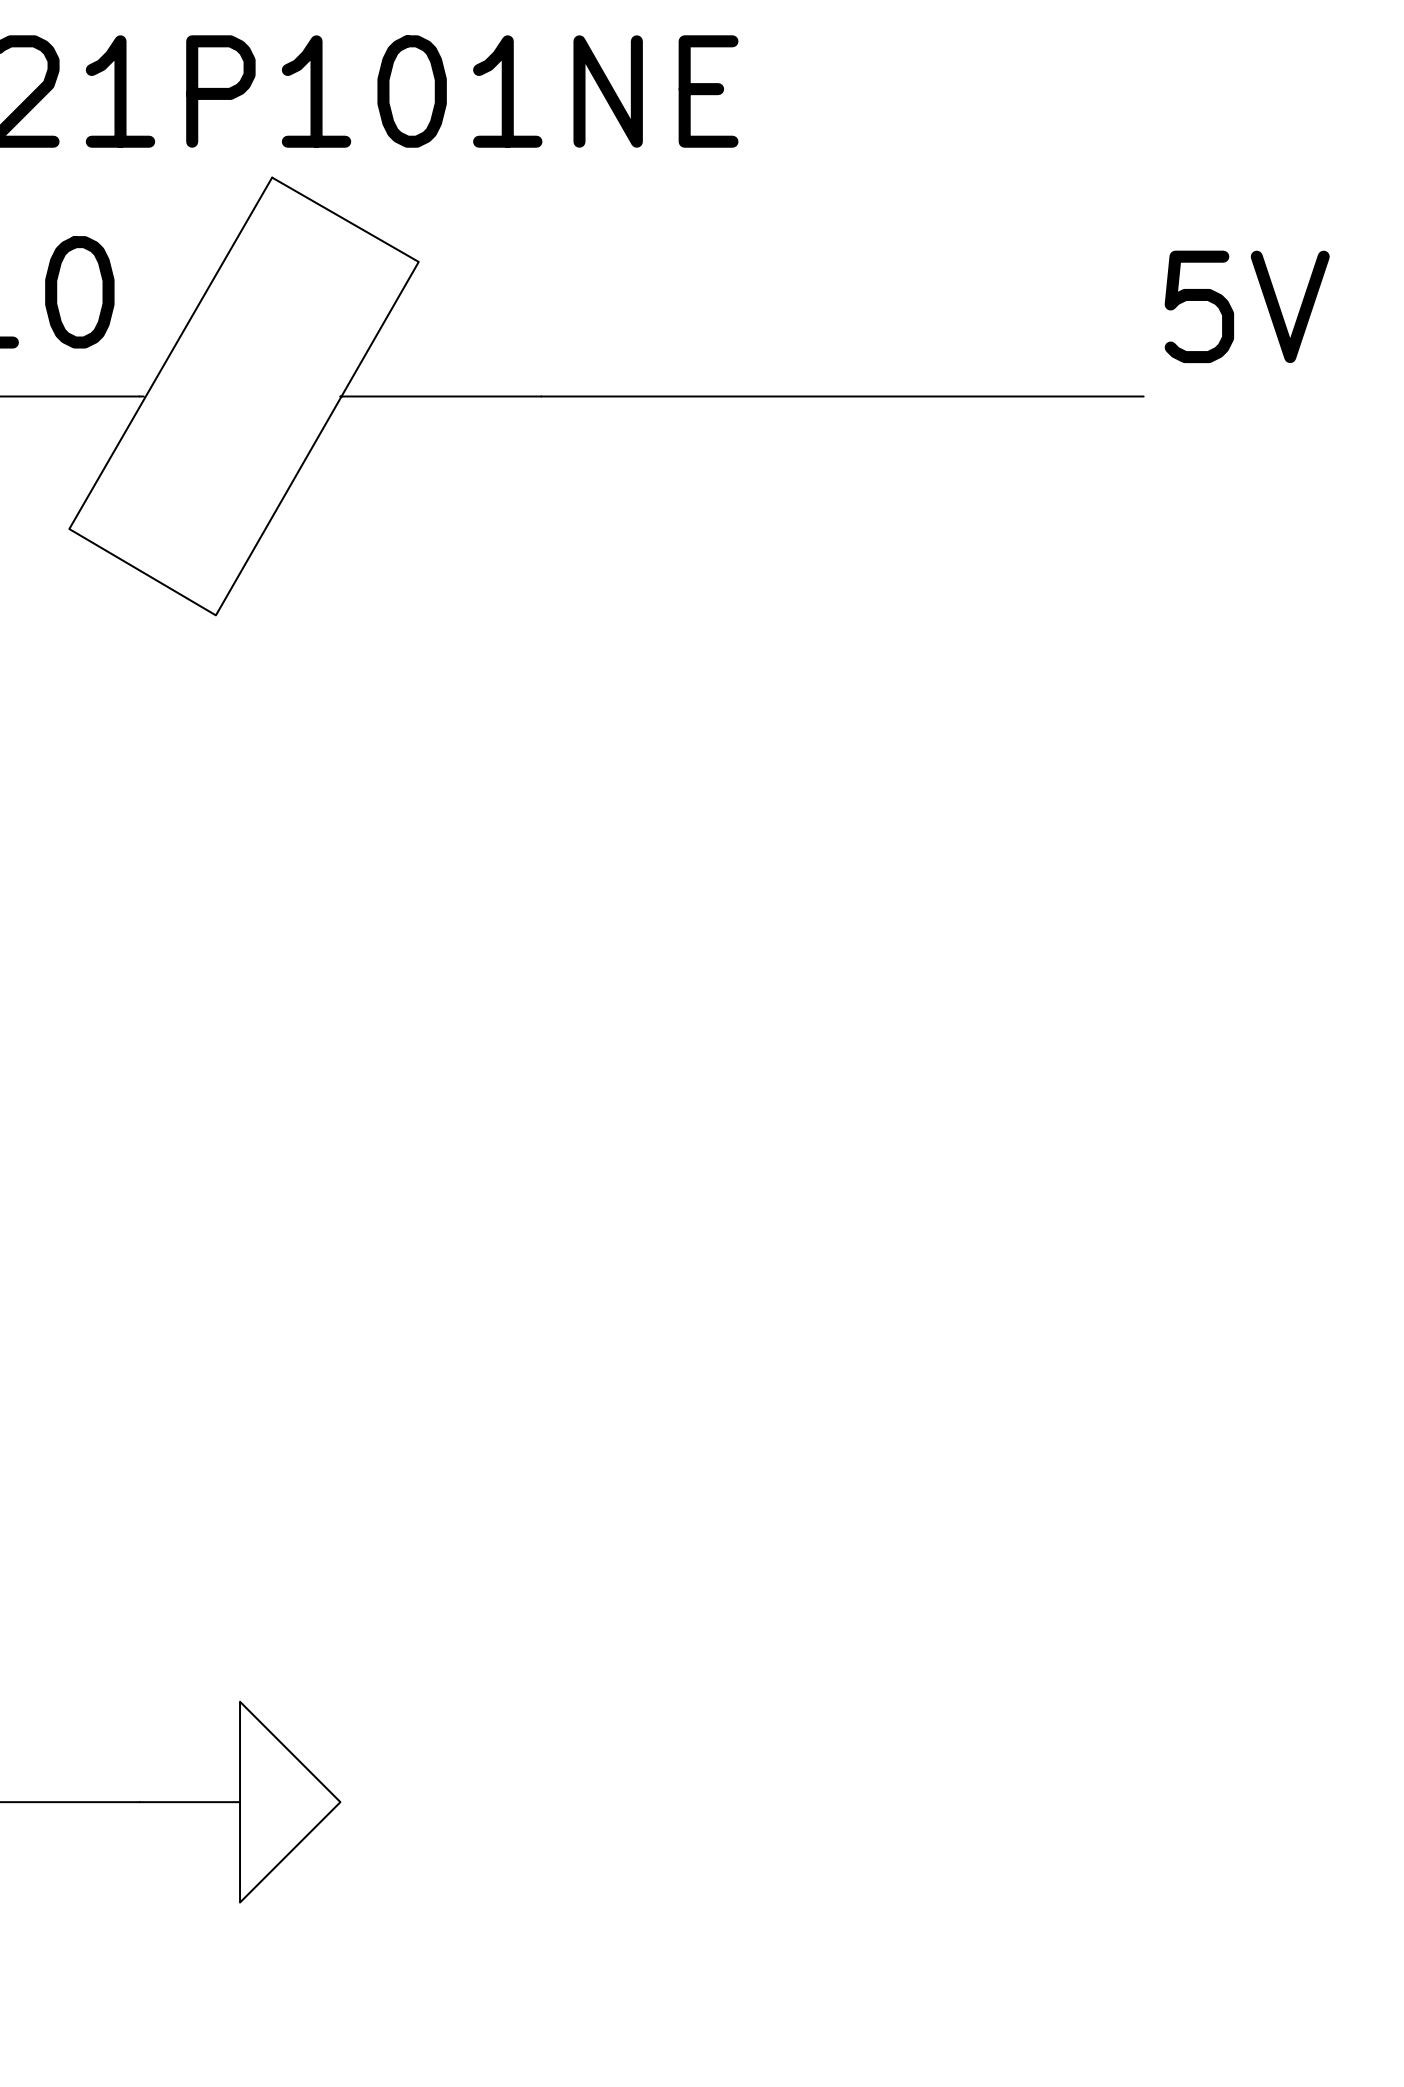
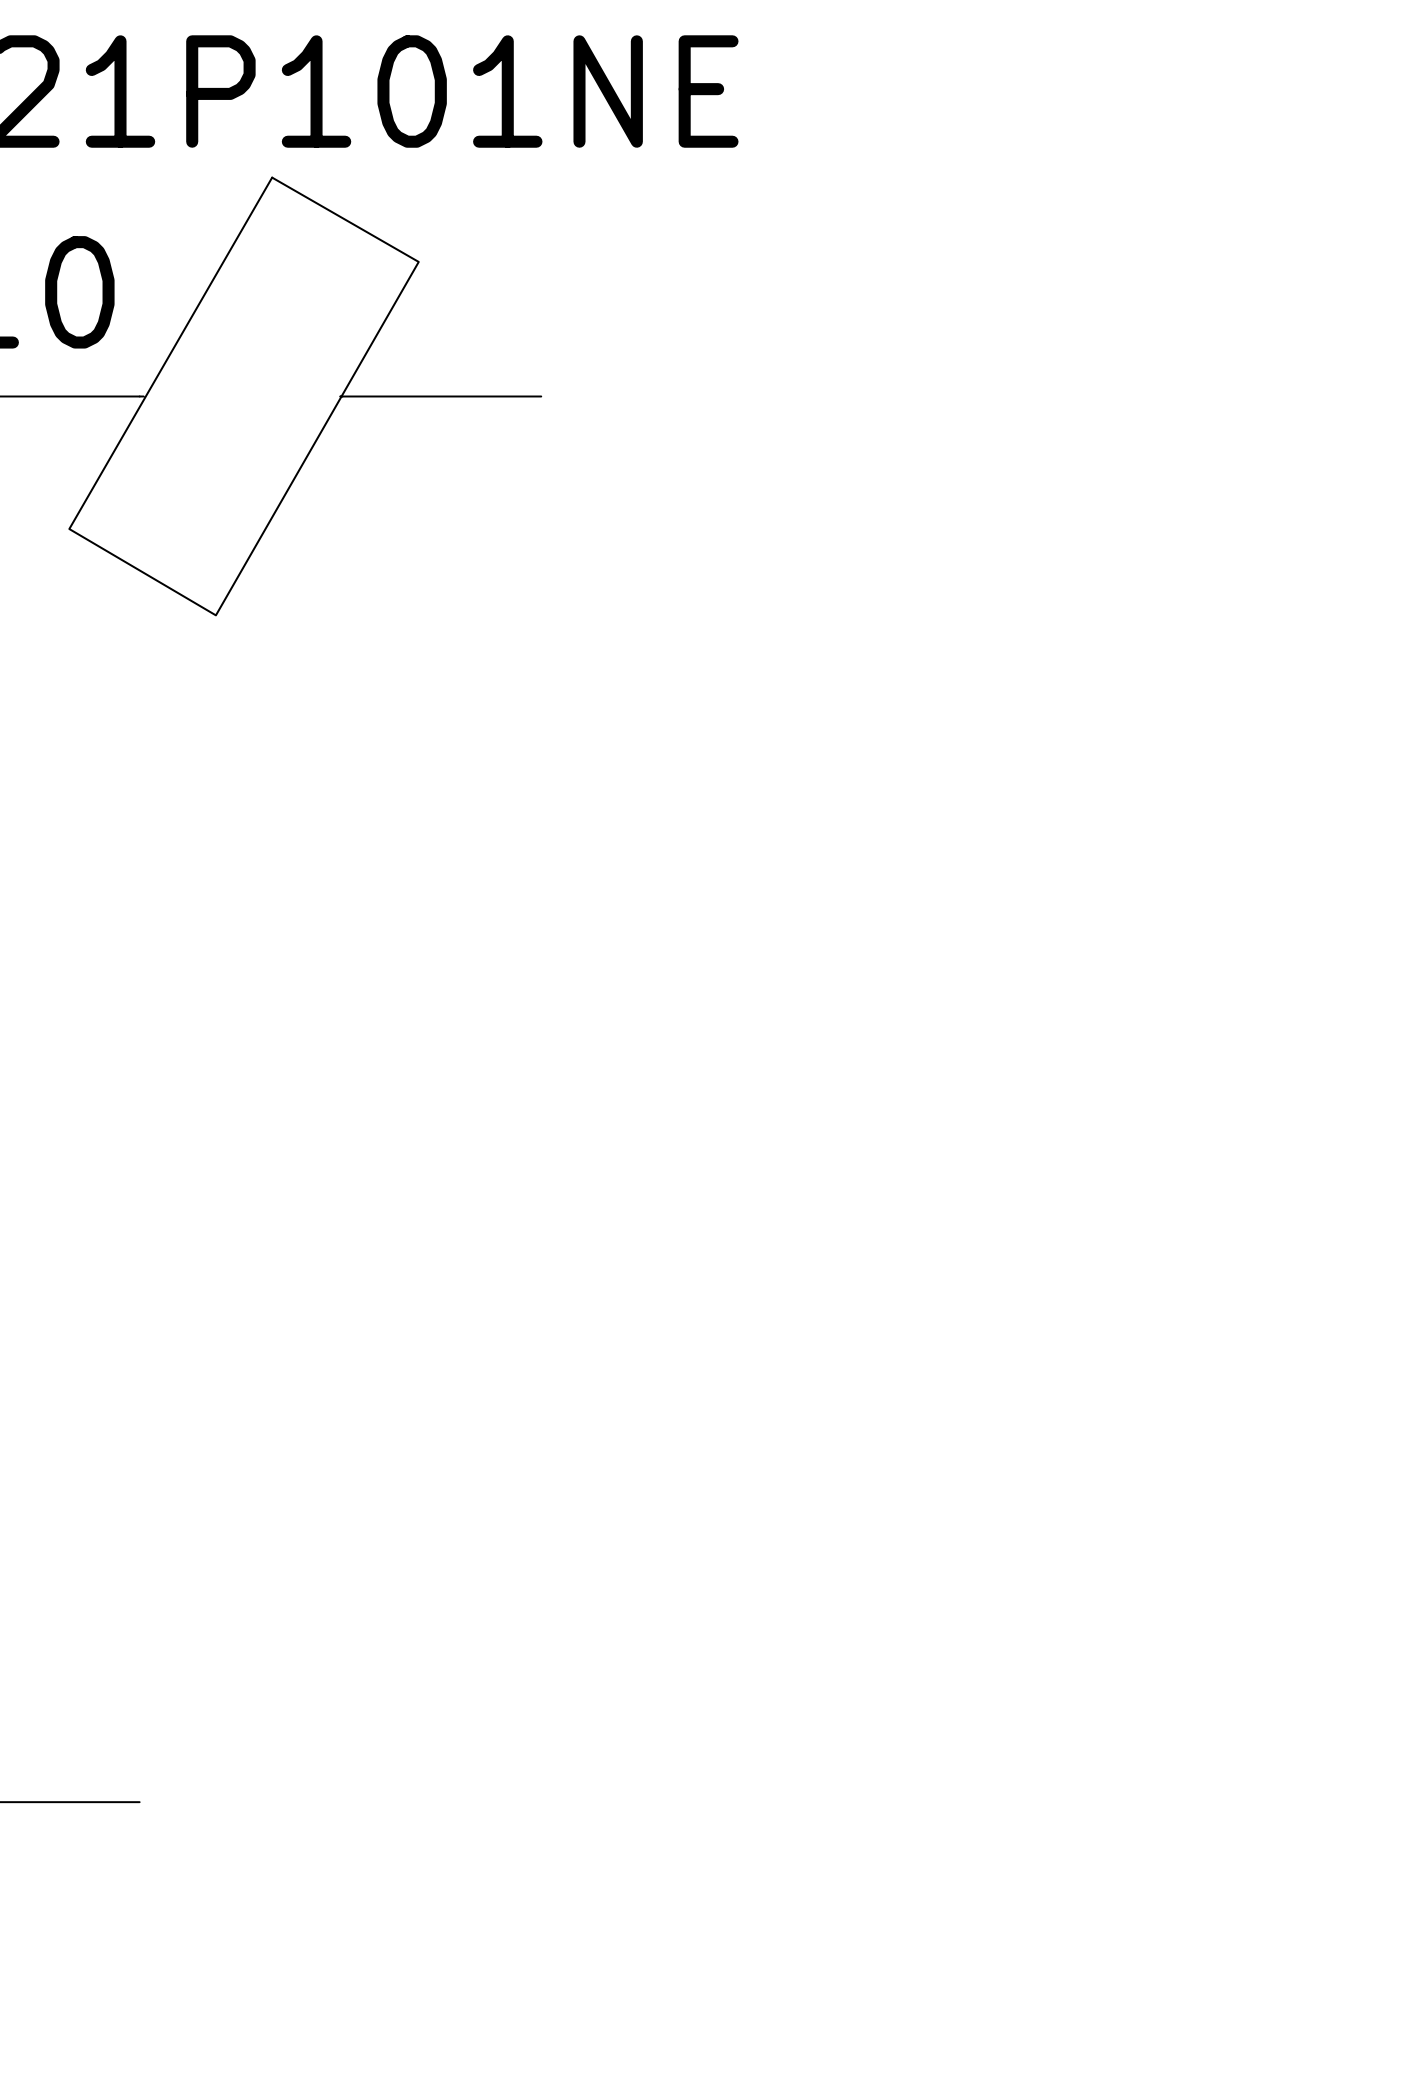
label: 5V (1247, 306) -> none
wire: (541, 396) (1143, 396) -> none
power symbol: (240, 1802) -> none

